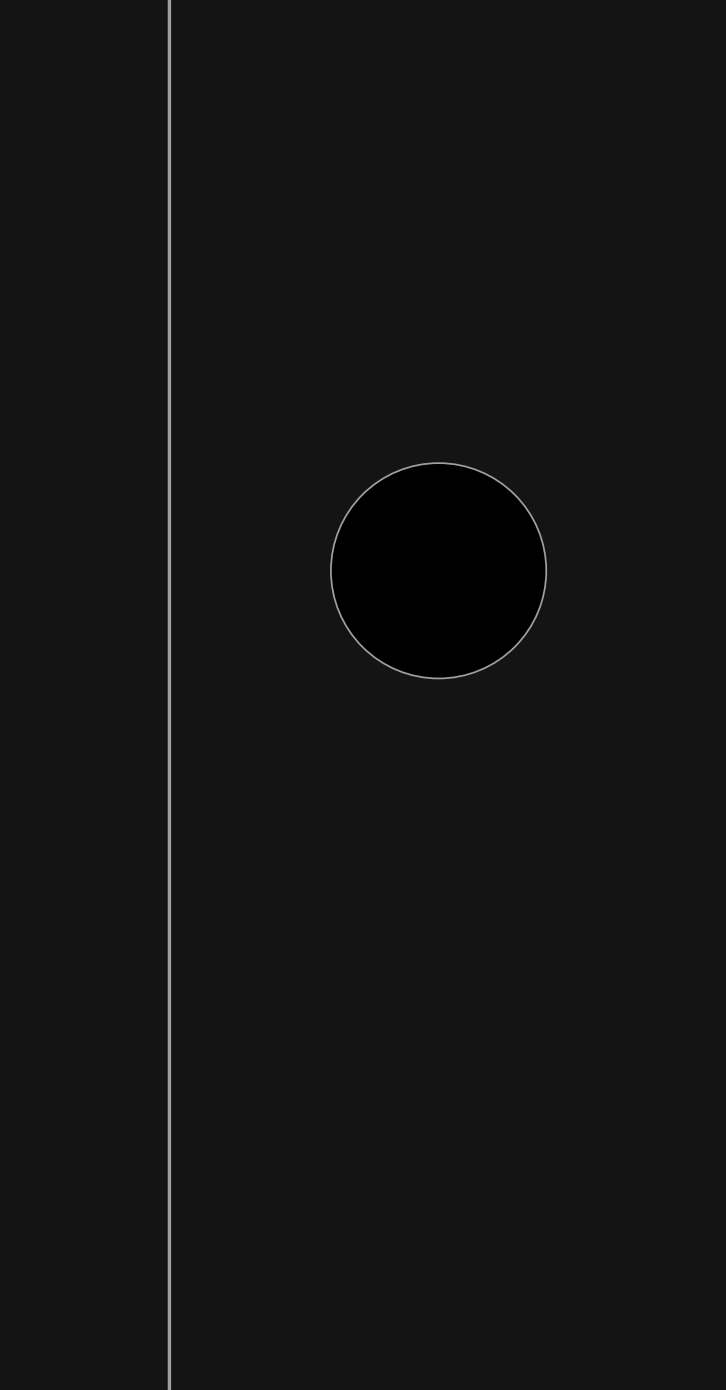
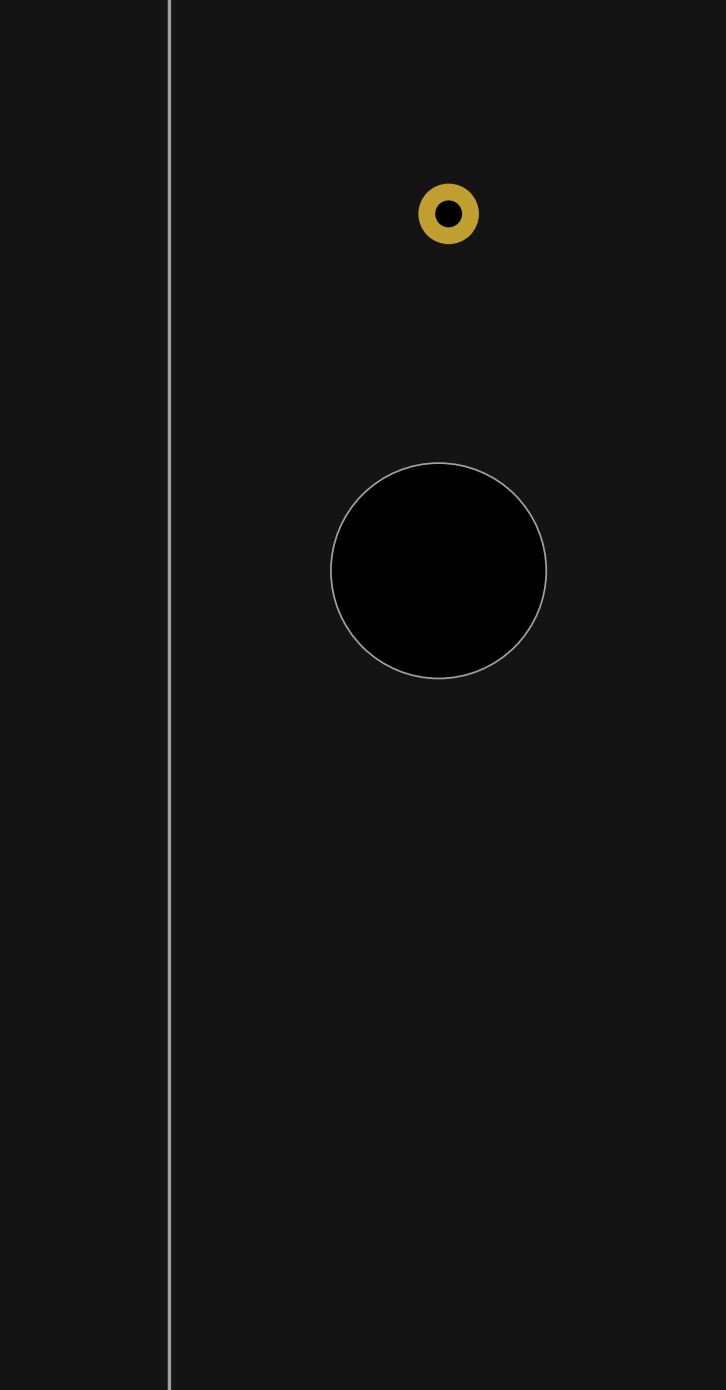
via: none -> (448, 213)

